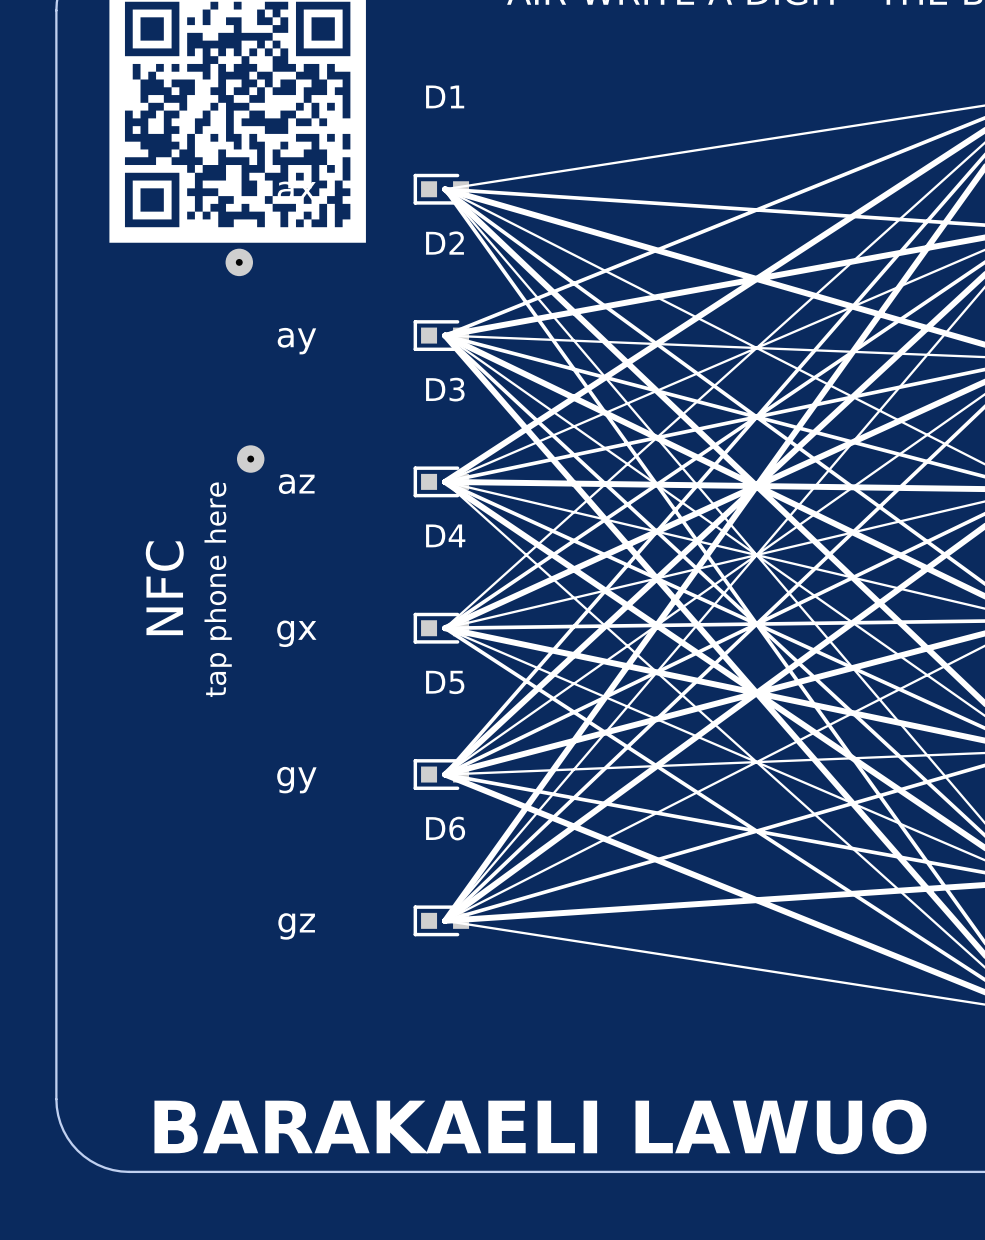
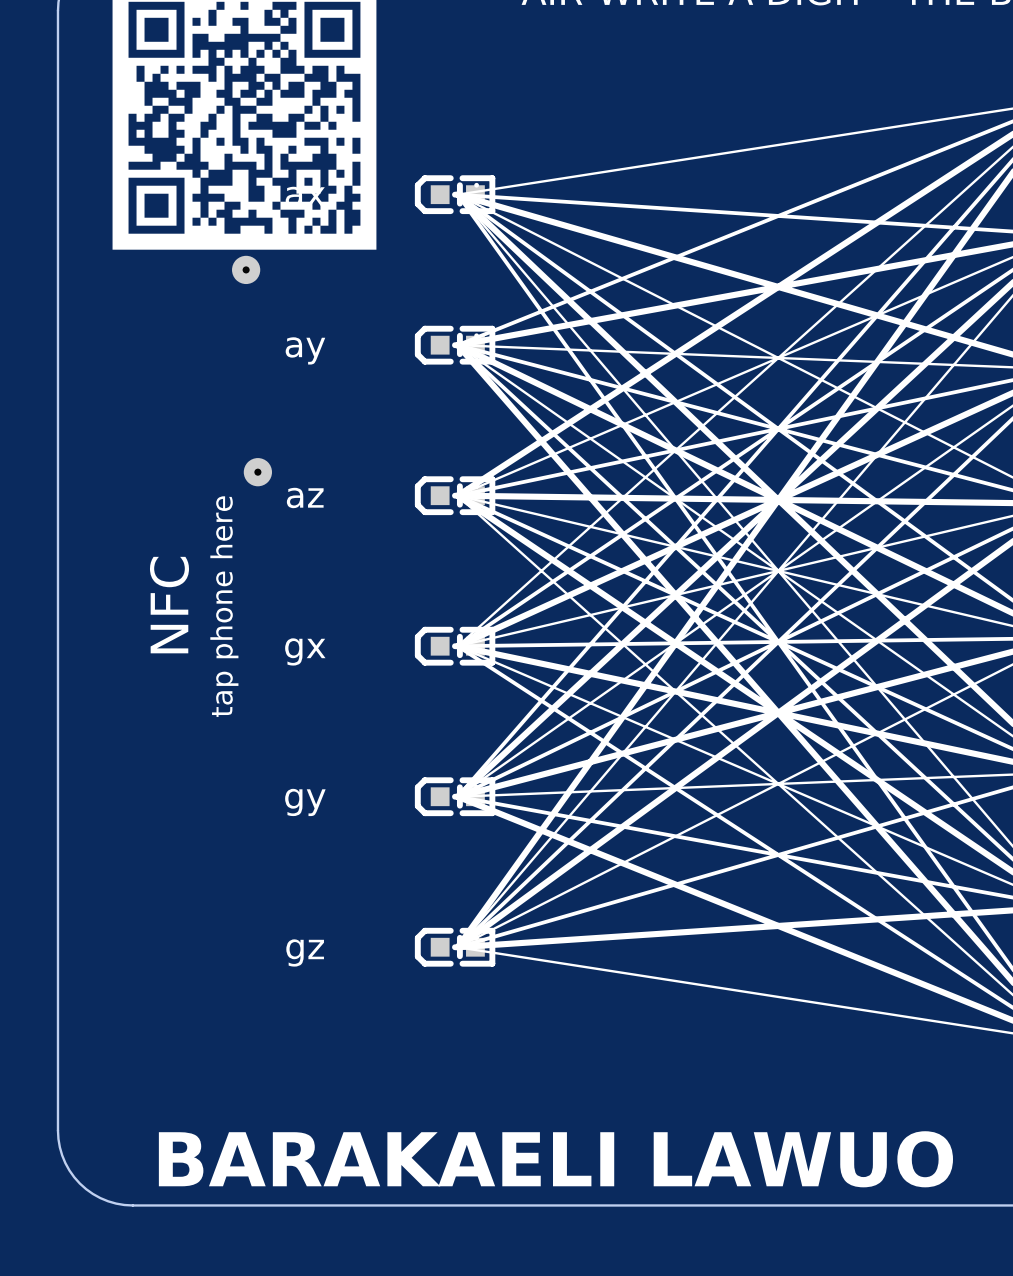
D1: (441, 189) -> none
part: none -> (455, 194)
D2: (441, 335) -> none
part: none -> (455, 345)
D3: (441, 481) -> none
part: none -> (455, 495)
D4: (441, 628) -> none
part: none -> (455, 646)
D5: (441, 774) -> none
part: none -> (455, 796)
D6: (441, 920) -> none
part: none -> (455, 947)

